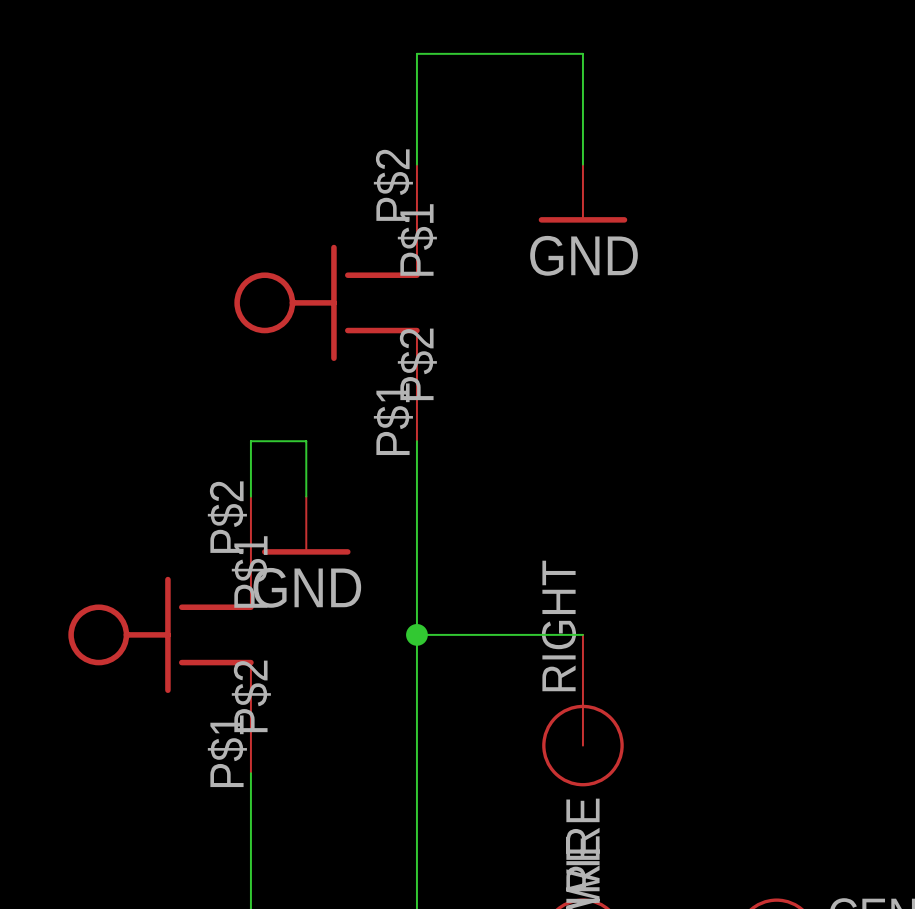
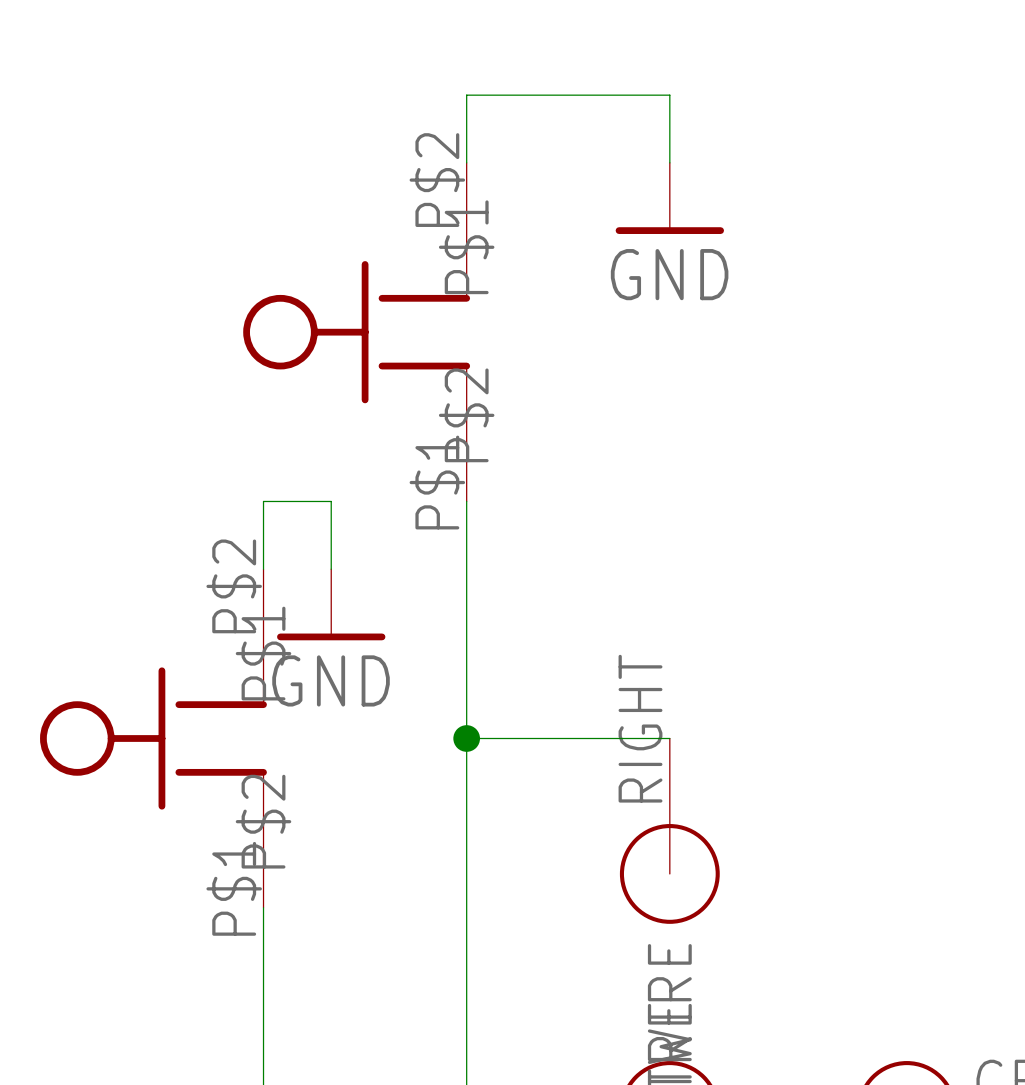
wire: (416, 109) (416, 53) (582, 53) (582, 109) -> (466, 95) (669, 95)

